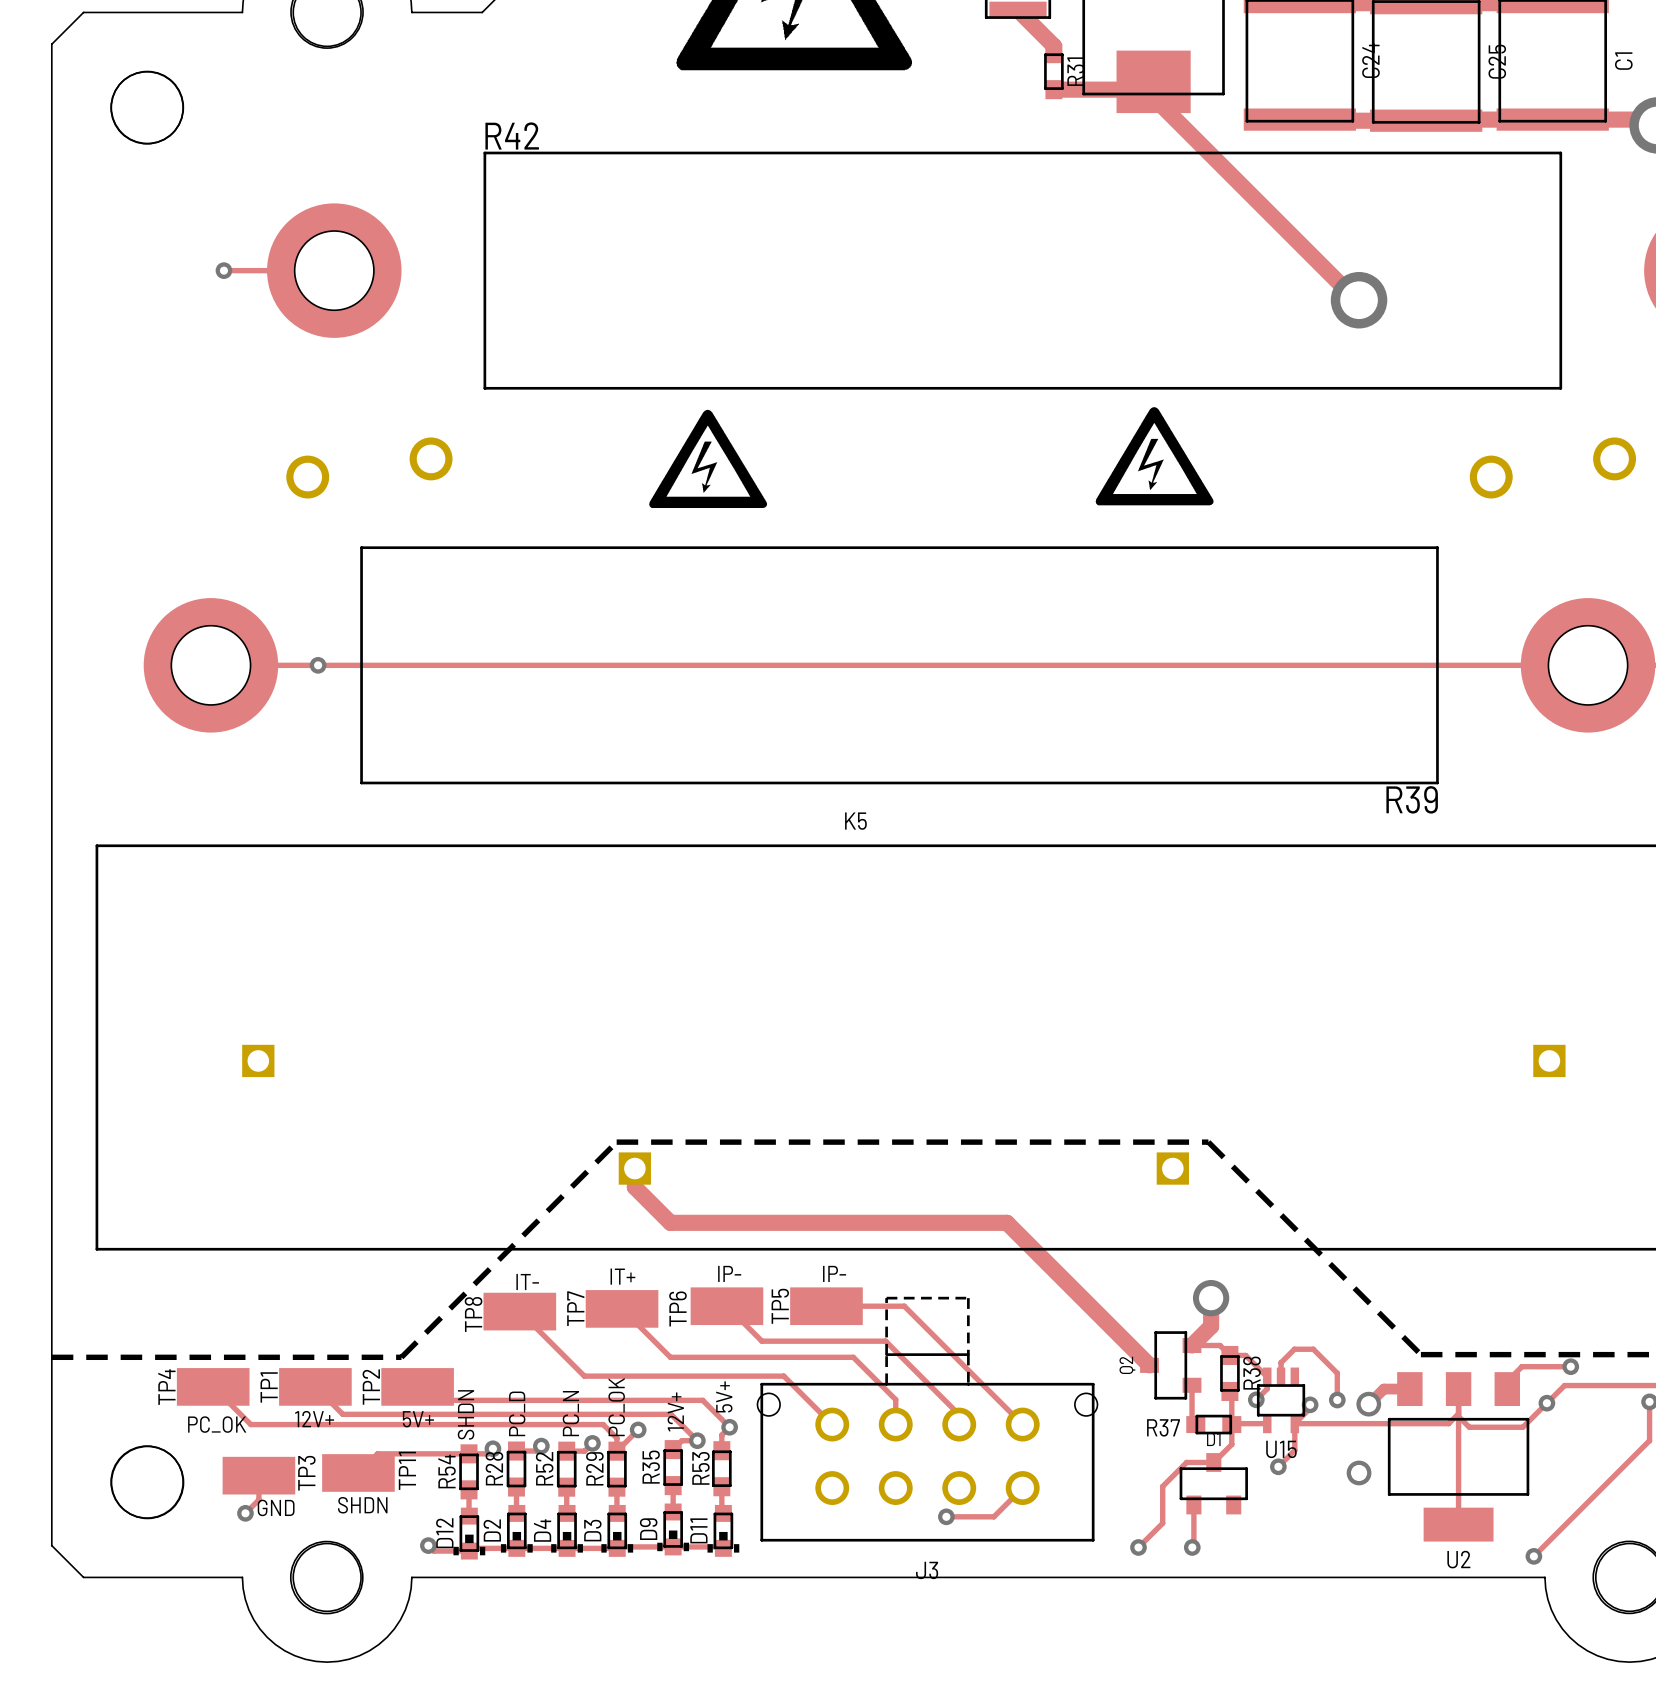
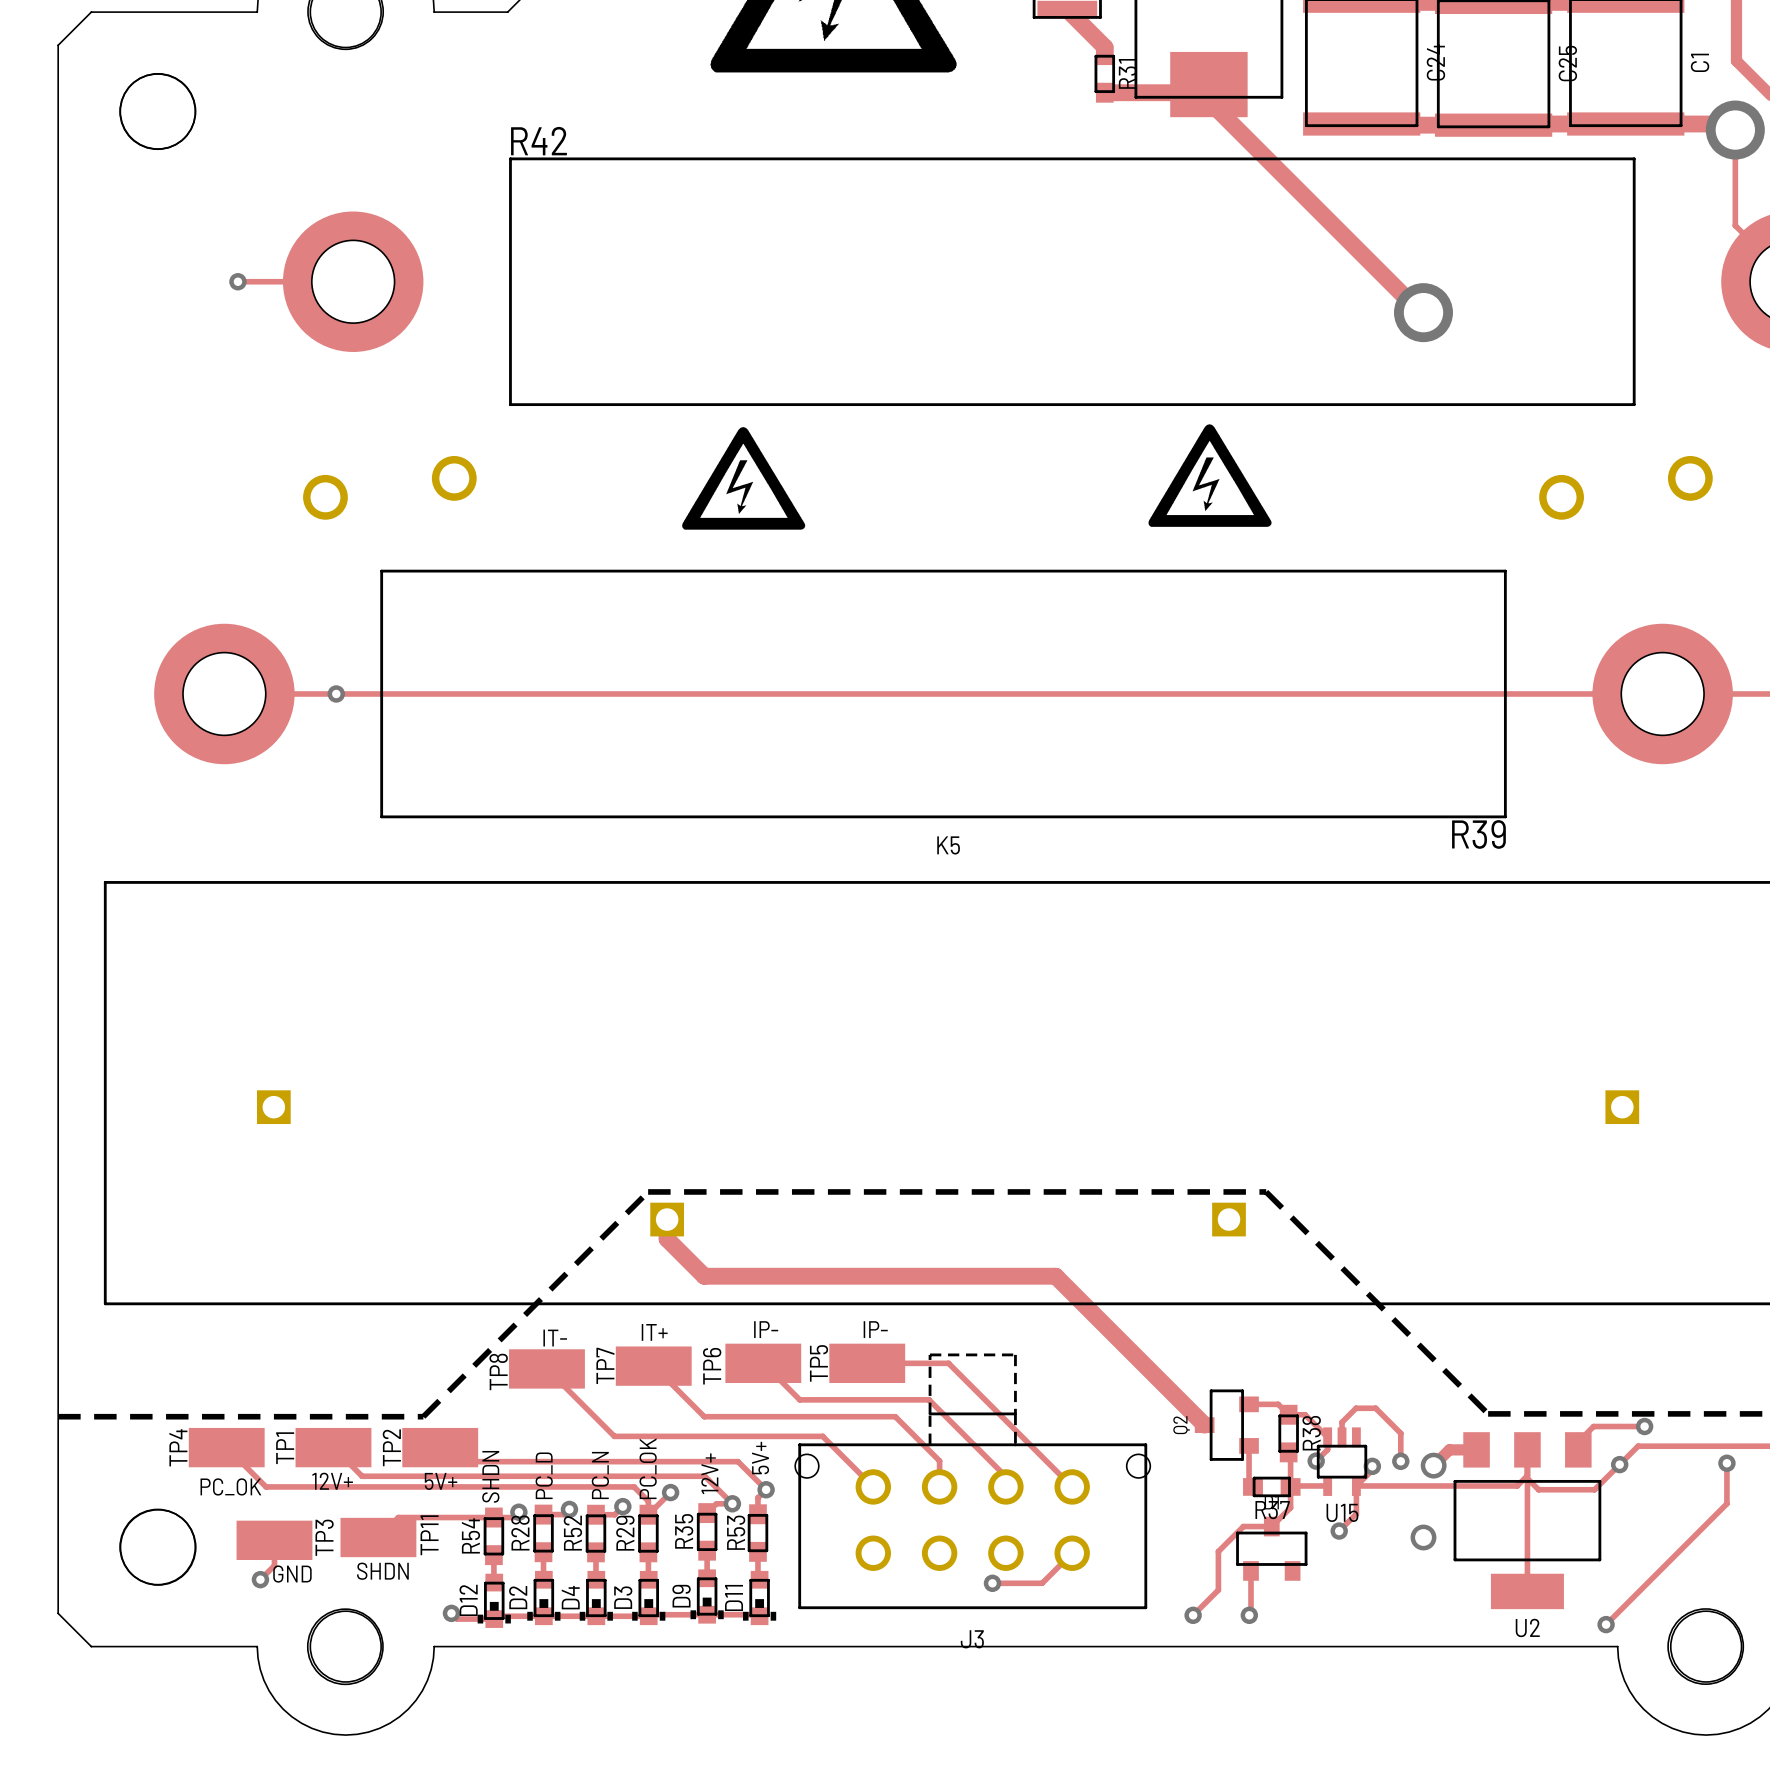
K5 name position: K5 (855, 821) -> K5 (948, 845)
track: (1211, 1298) (1211, 1326) (1192, 1345) -> none
via: (1211, 1298) -> none
R37 name position: R37 (1163, 1427) -> R37 (1272, 1510)

